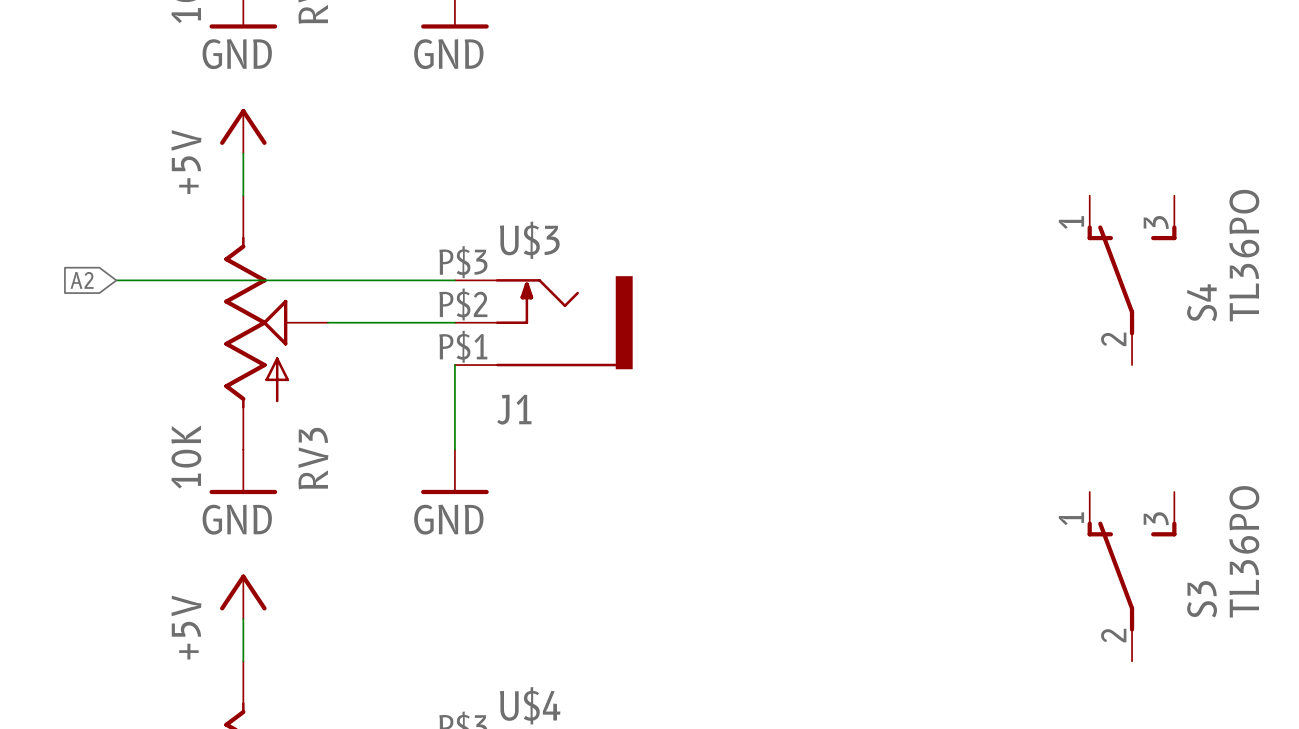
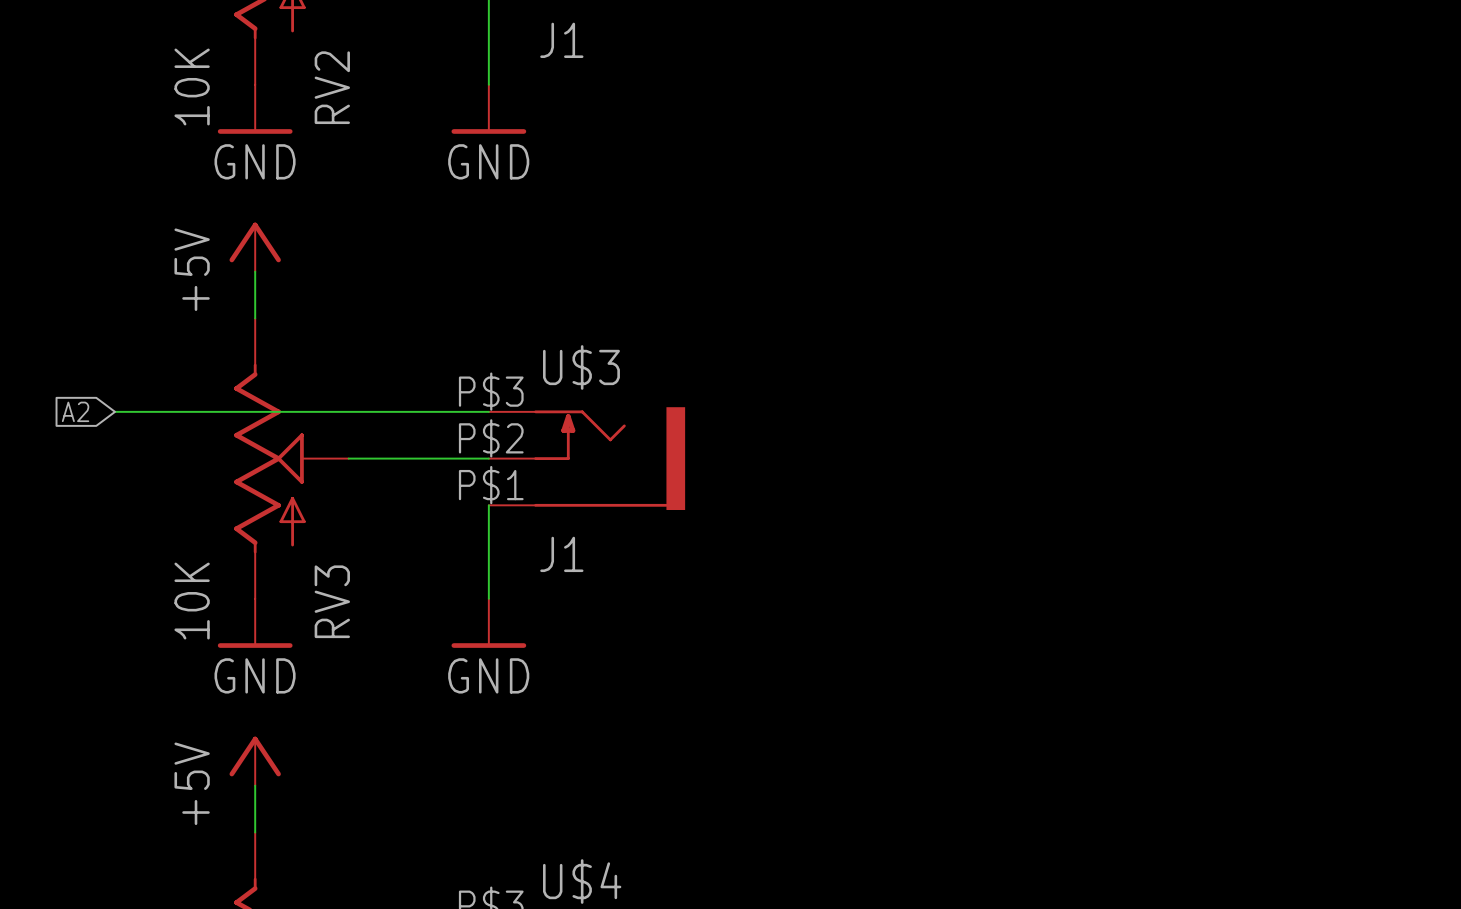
S4: TL36PO (1132, 280) -> none
S3: TL36PO (1132, 576) -> none

